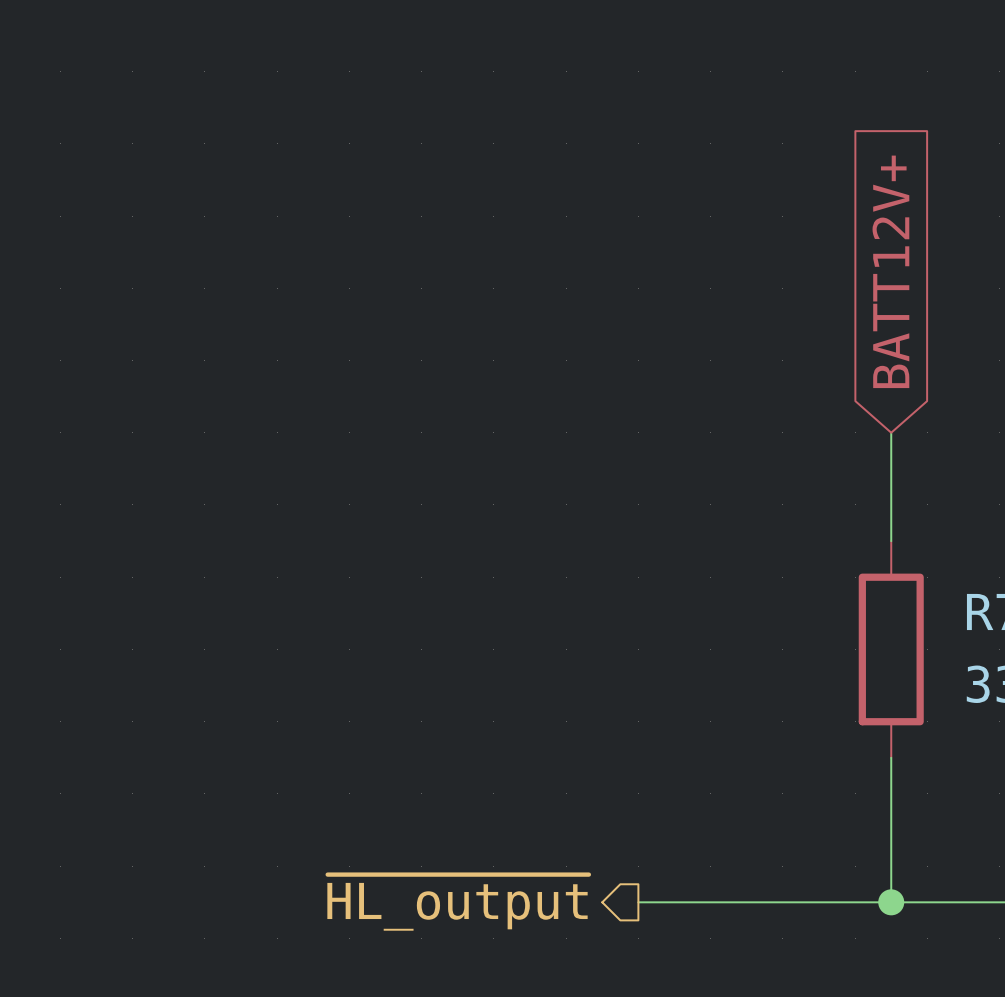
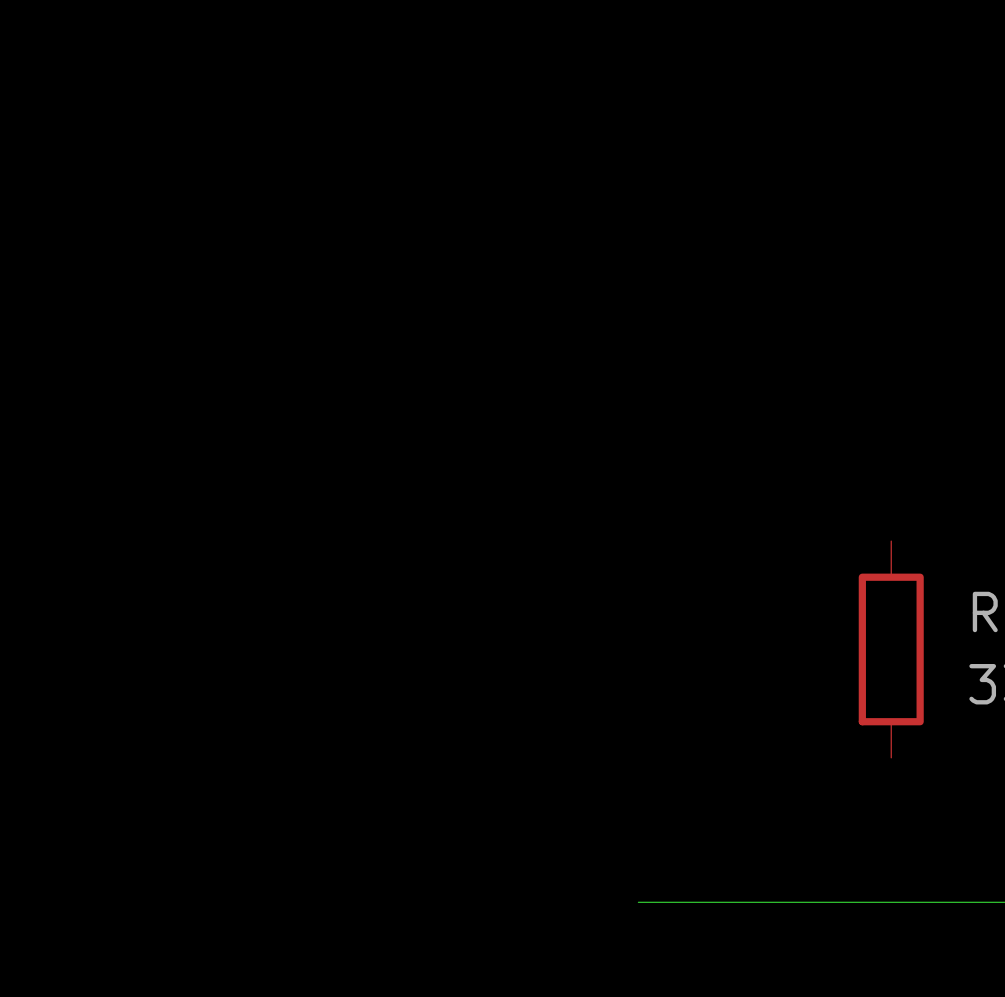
global label: BATT12V+ (890, 271) -> none
wire: (891, 432) (891, 541) -> none
wire: (891, 757) (891, 902) -> none
hierarchical label: ~{HL_output} (458, 902) -> none
junction: (891, 902) -> none

